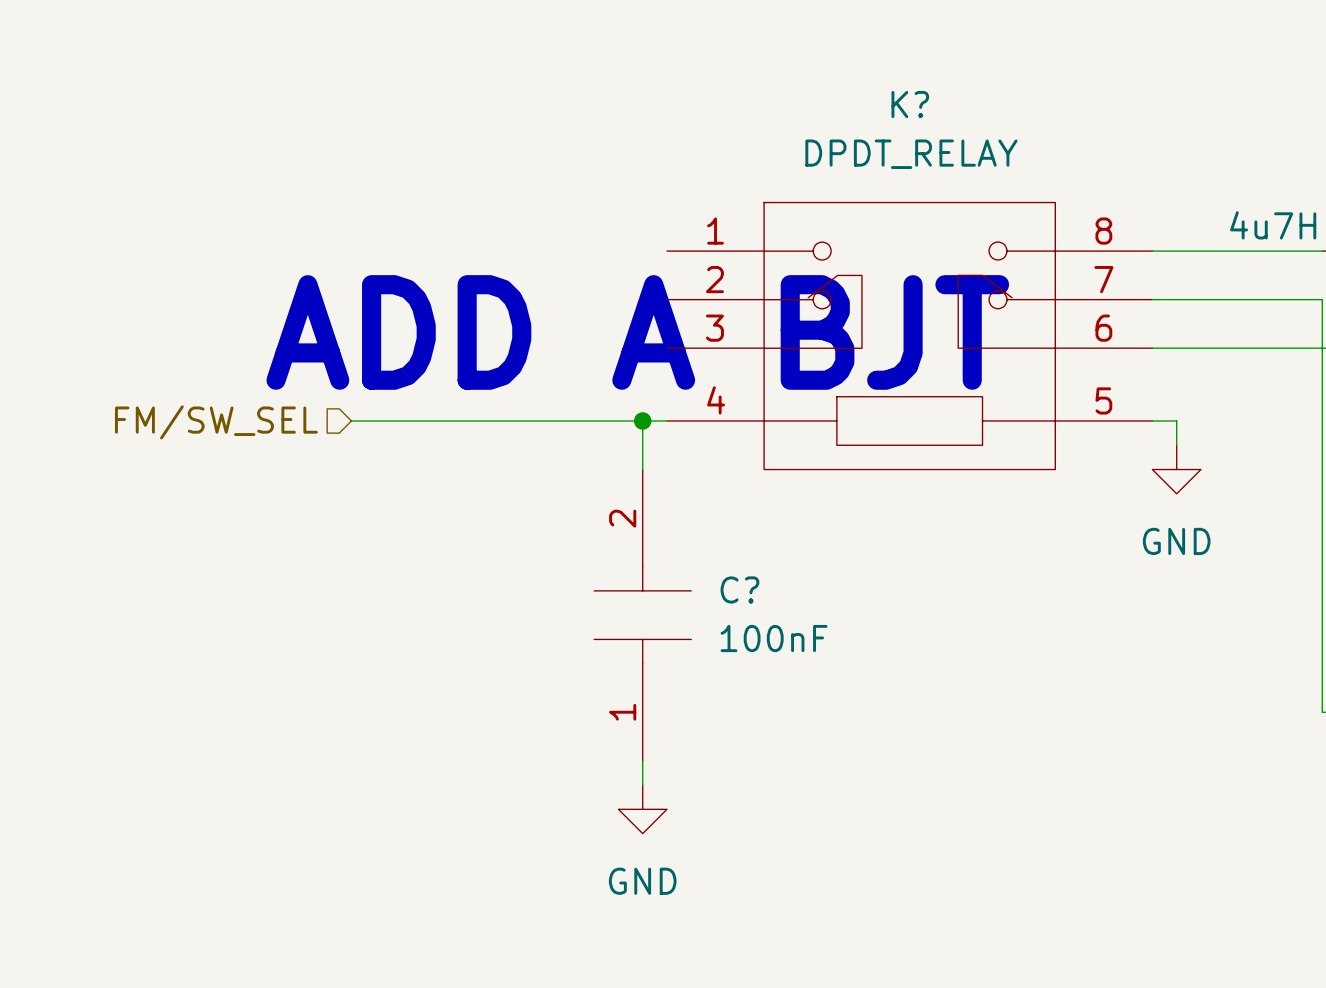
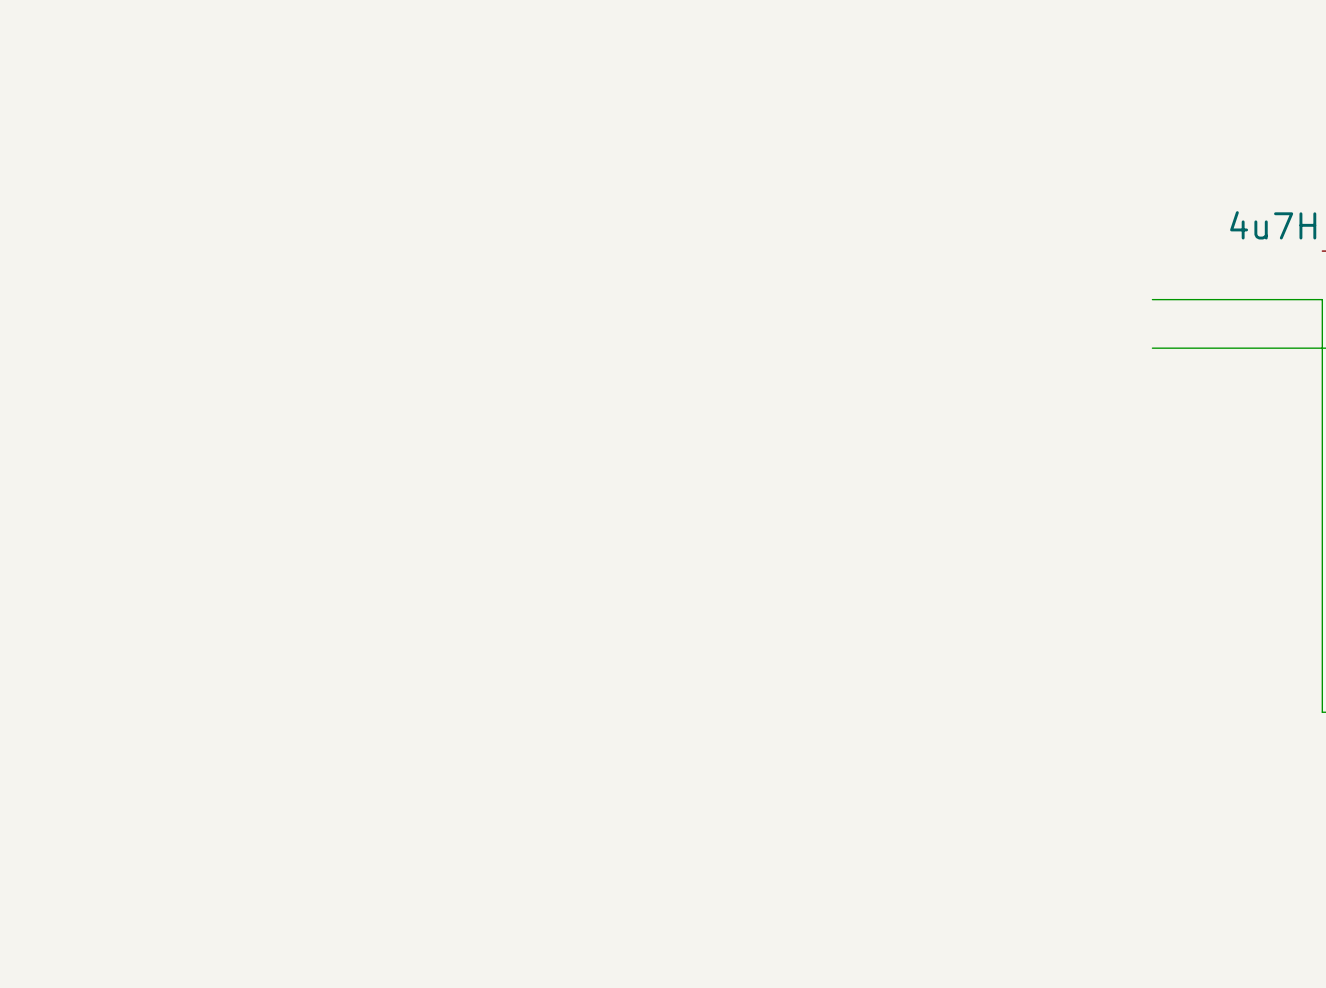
wire: (1152, 251) (1322, 251) -> none
text: ADD A BJT (637, 332) -> none
K?: DPDT_RELAY (909, 336) -> none
wire: (351, 420) (666, 420) -> none
wire: (642, 420) (642, 469) -> none
junction: (642, 420) -> none
wire: (1152, 420) (1176, 420) (1176, 445) -> none
hierarchical label: FM/SW_SEL (216, 422) -> none
power symbol: GND (1176, 469) -> none
C?: 100nF (642, 615) -> none
wire: (642, 760) (642, 785) -> none
power symbol: GND (642, 809) -> none

